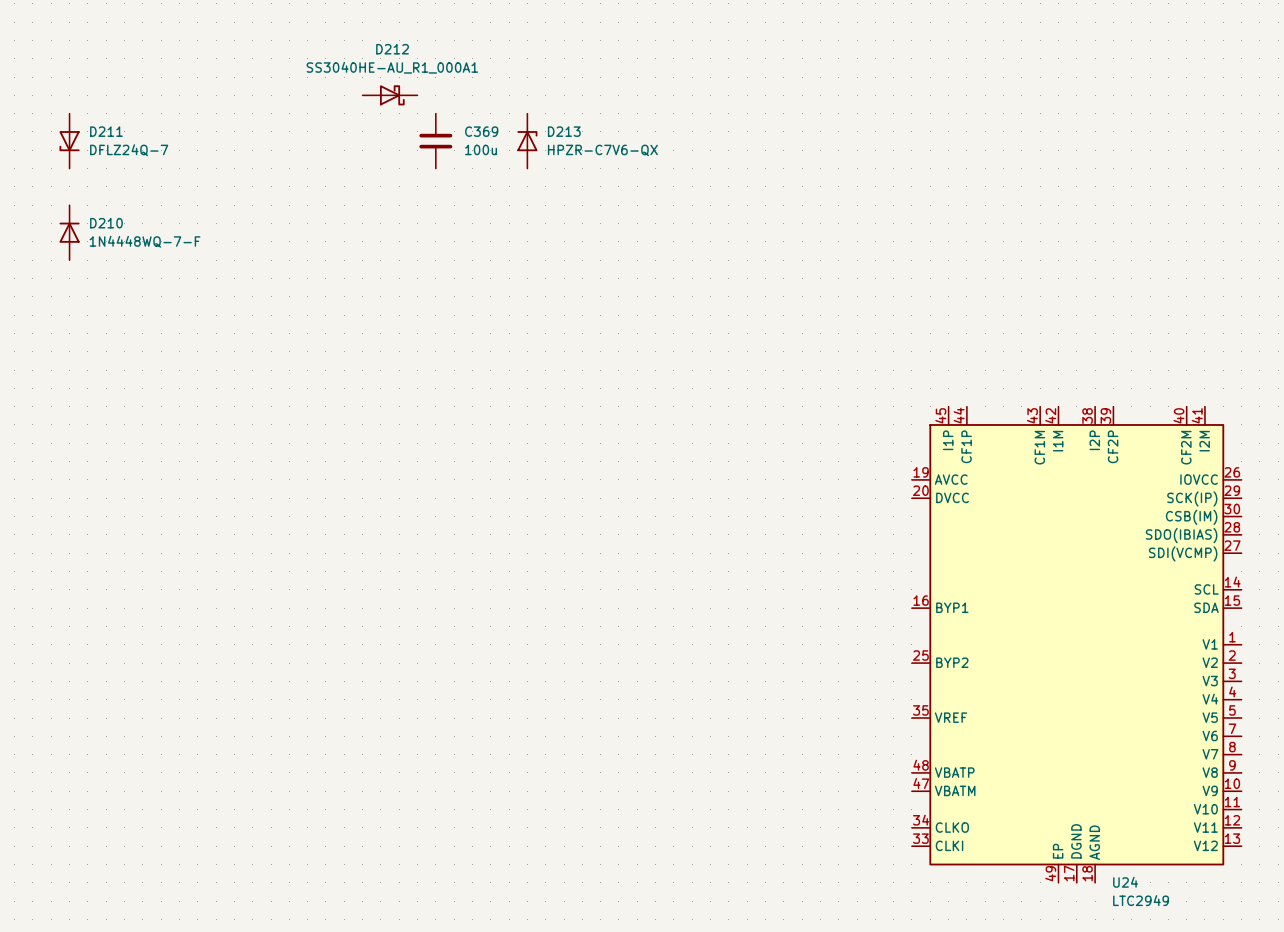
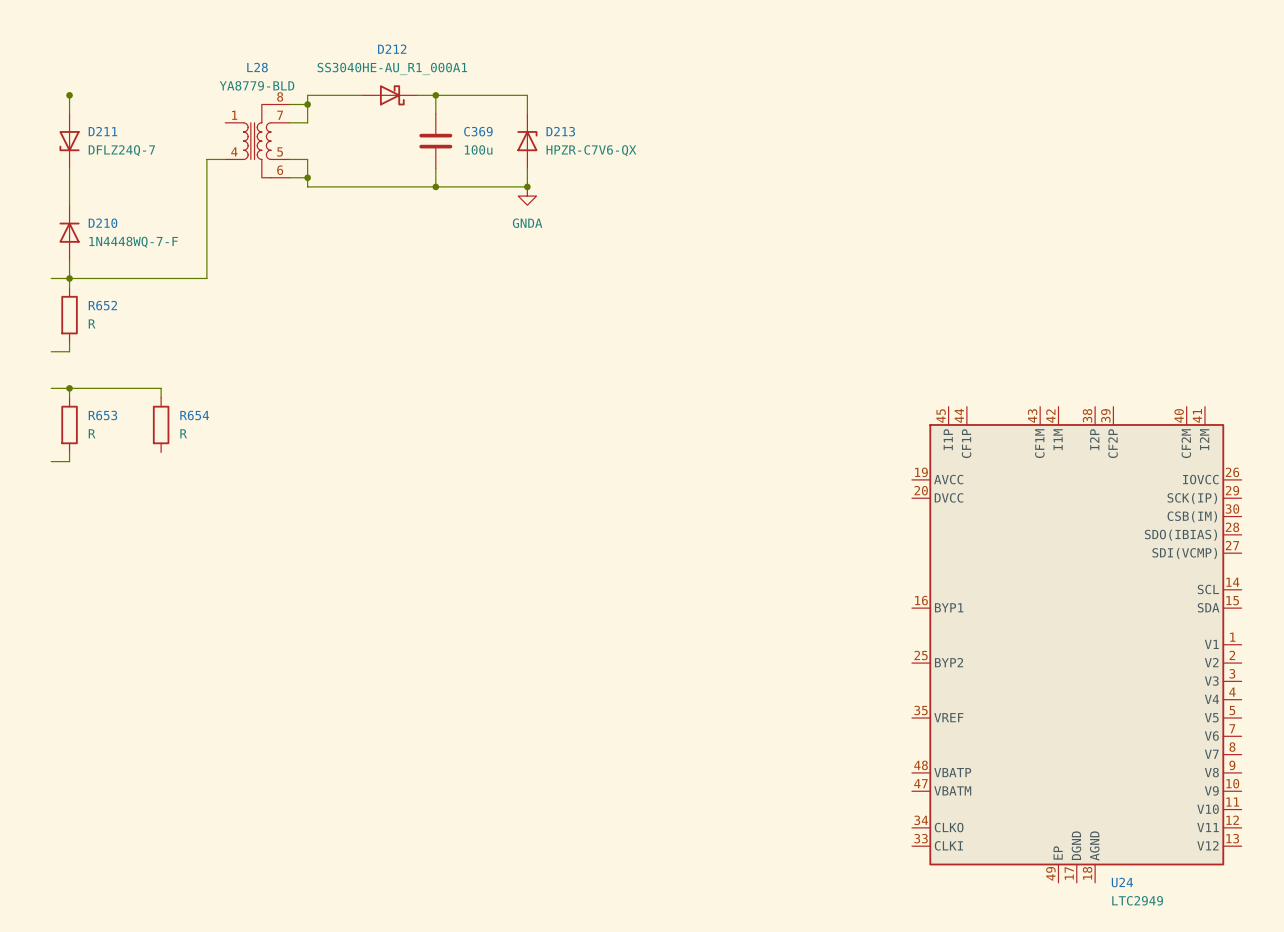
wire: none -> (69, 95) (69, 113)
junction: none -> (69, 95)
wire: none -> (362, 95) (307, 95) (307, 122) (289, 122)
wire: none -> (417, 95) (527, 95) (527, 113)
wire: none -> (435, 95) (435, 113)
junction: none -> (435, 95)
wire: none -> (289, 104) (307, 104)
junction: none -> (307, 104)
L28: none -> YA8779-BLD (257, 141)
wire: none -> (225, 159) (206, 159) (206, 278) (51, 278)
wire: none -> (289, 159) (307, 159) (307, 186) (527, 186) (527, 168)
wire: none -> (69, 168) (69, 205)
wire: none -> (435, 168) (435, 186)
wire: none -> (289, 177) (307, 177)
junction: none -> (307, 177)
junction: none -> (435, 186)
junction: none -> (527, 186)
power symbol: none -> GNDA (527, 196)
wire: none -> (69, 260) (69, 287)
junction: none -> (69, 278)
R652: none -> R (69, 315)
wire: none -> (69, 342) (69, 351) (51, 351)
wire: none -> (51, 388) (161, 388) (161, 397)
wire: none -> (69, 388) (69, 397)
junction: none -> (69, 388)
R653: none -> R (69, 424)
R654: none -> R (161, 424)
wire: none -> (69, 452) (69, 461) (51, 461)

